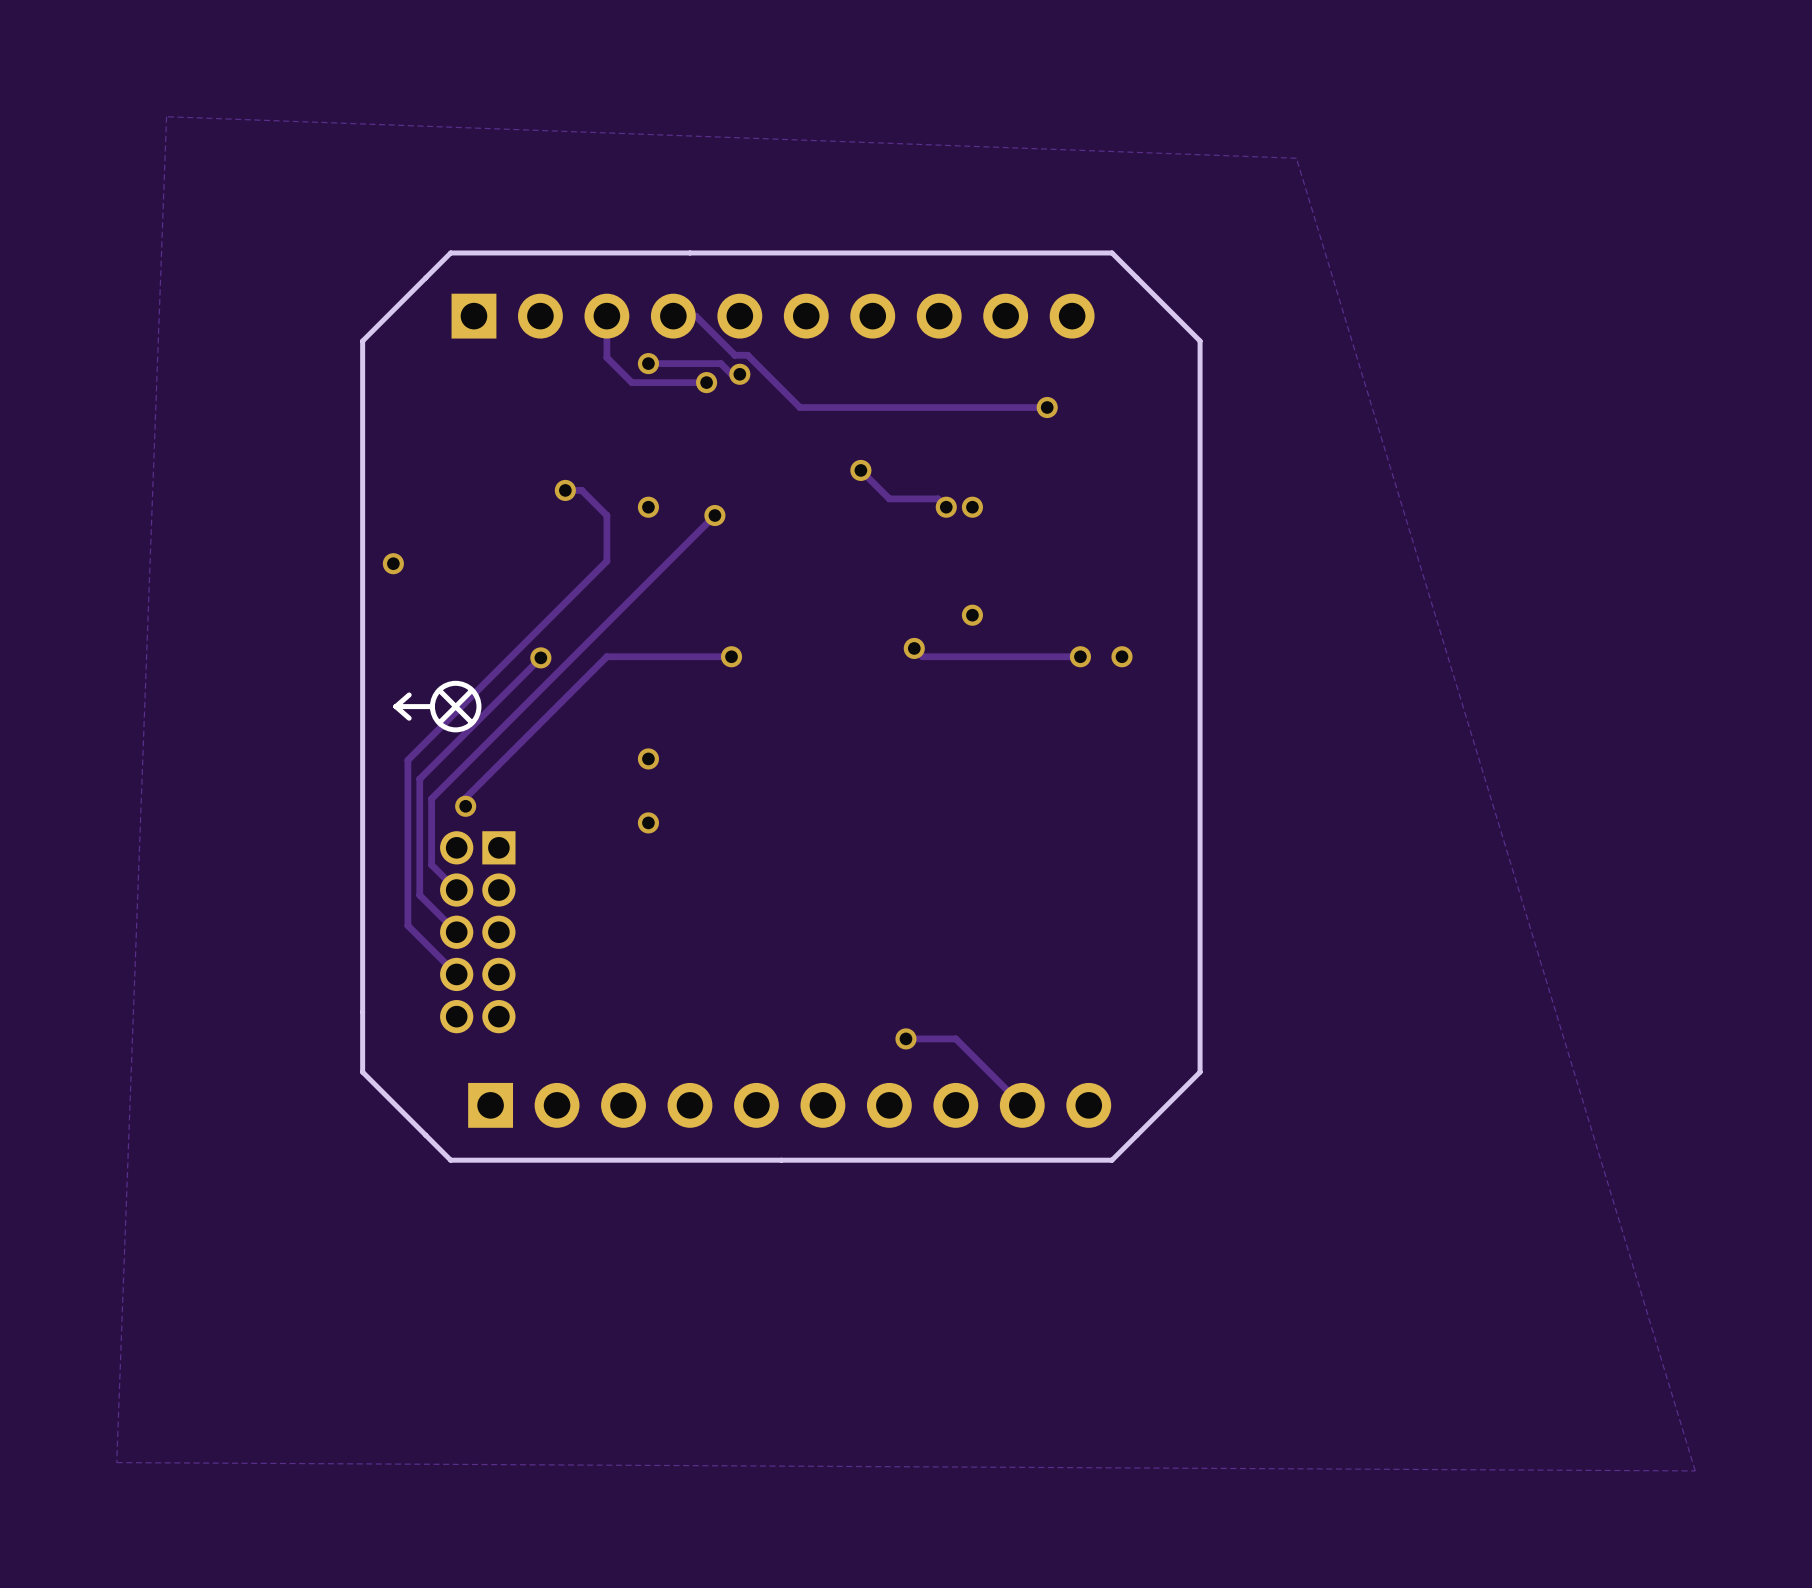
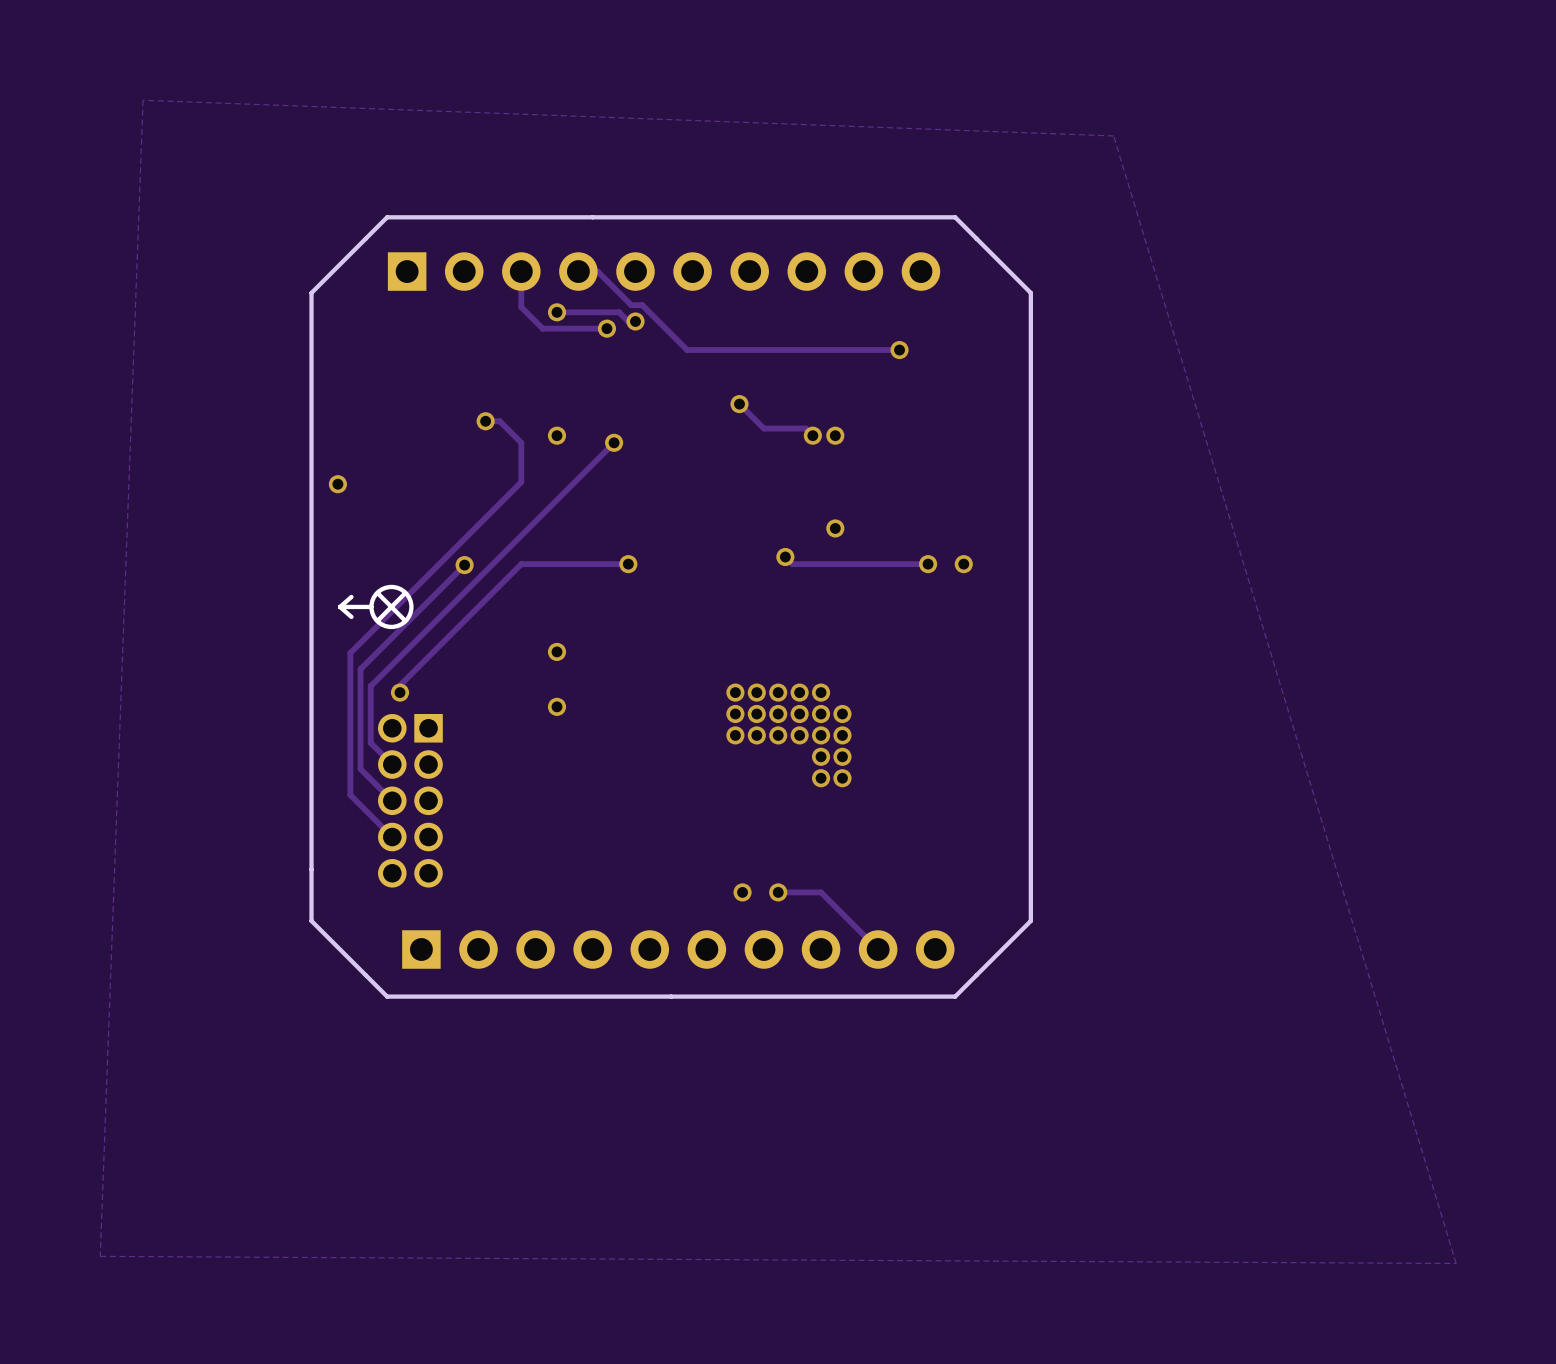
via: none -> (735, 692)
via: none -> (756, 692)
via: none -> (778, 692)
via: none -> (799, 692)
via: none -> (821, 692)
via: none -> (735, 714)
via: none -> (756, 714)
via: none -> (778, 714)
via: none -> (799, 714)
via: none -> (821, 714)
via: none -> (842, 714)
via: none -> (735, 735)
via: none -> (756, 735)
via: none -> (778, 735)
via: none -> (799, 735)
via: none -> (821, 735)
via: none -> (842, 735)
via: none -> (821, 756)
via: none -> (842, 756)
via: none -> (821, 778)
via: none -> (842, 778)
via: none -> (742, 892)

